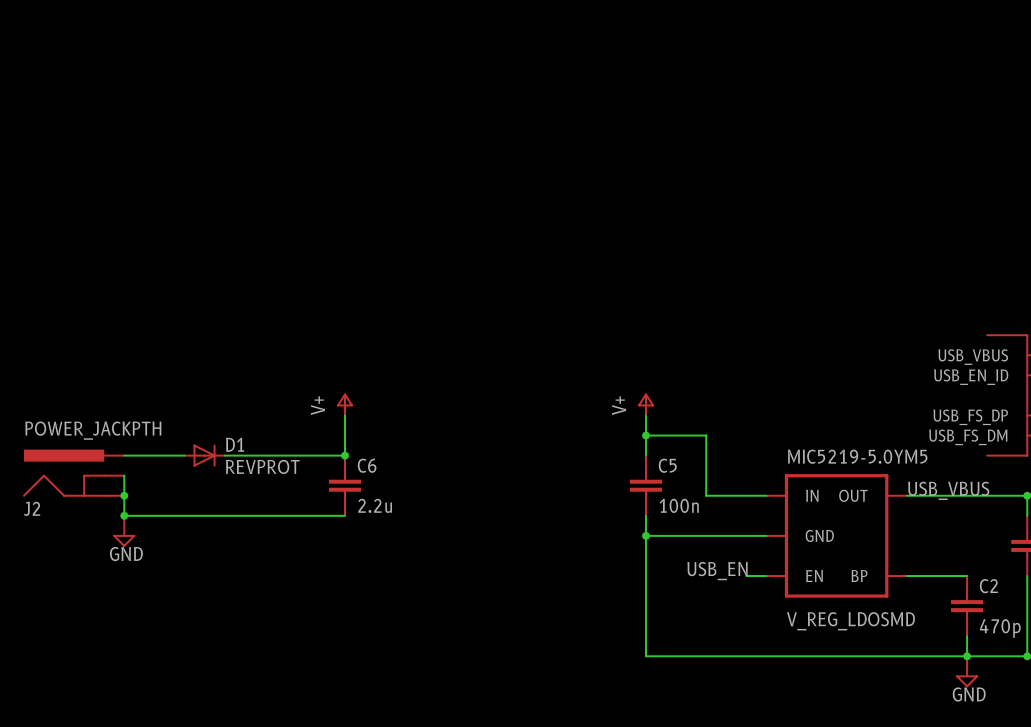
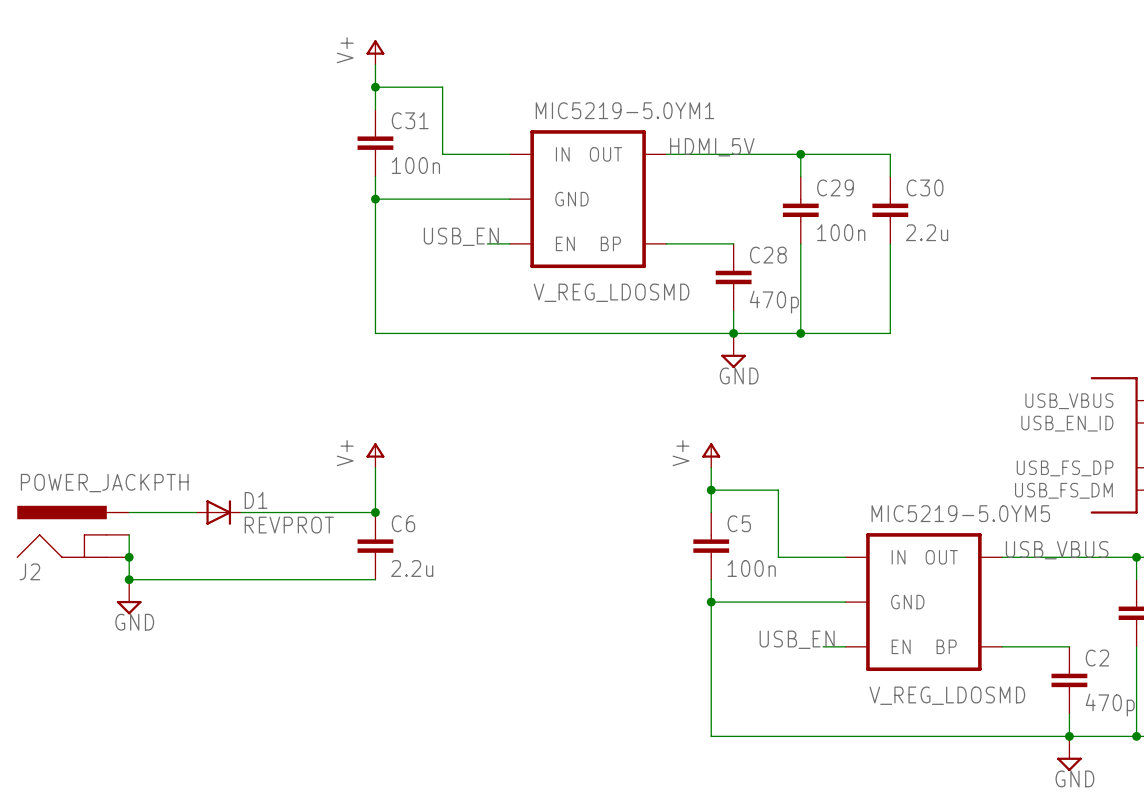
power symbol: none -> V+ (375, 52)
wire: none -> (375, 64) (375, 109)
wire: none -> (375, 87) (442, 87) (442, 154) (509, 154)
junction: none -> (375, 87)
C31: none -> 100n (375, 143)
label: none -> HDMI_5V (712, 147)
wire: none -> (666, 154) (890, 154) (890, 176)
wire: none -> (800, 154) (800, 176)
junction: none -> (800, 154)
wire: none -> (375, 176) (375, 333) (890, 333) (890, 243)
wire: none -> (375, 199) (509, 199)
junction: none -> (375, 199)
MIC5219-5.0YM1: none -> V_REG_LDOSMD (588, 199)
C29: none -> 100n (800, 210)
C30: none -> 2.2u (890, 210)
label: none -> USB_EN (461, 236)
wire: none -> (487, 243) (509, 243)
wire: none -> (666, 243) (733, 243)
wire: none -> (800, 243) (800, 333)
C28: none -> 470p (733, 277)
wire: none -> (733, 311) (733, 333)
junction: none -> (733, 333)
junction: none -> (800, 333)
power symbol: none -> GND (733, 350)

